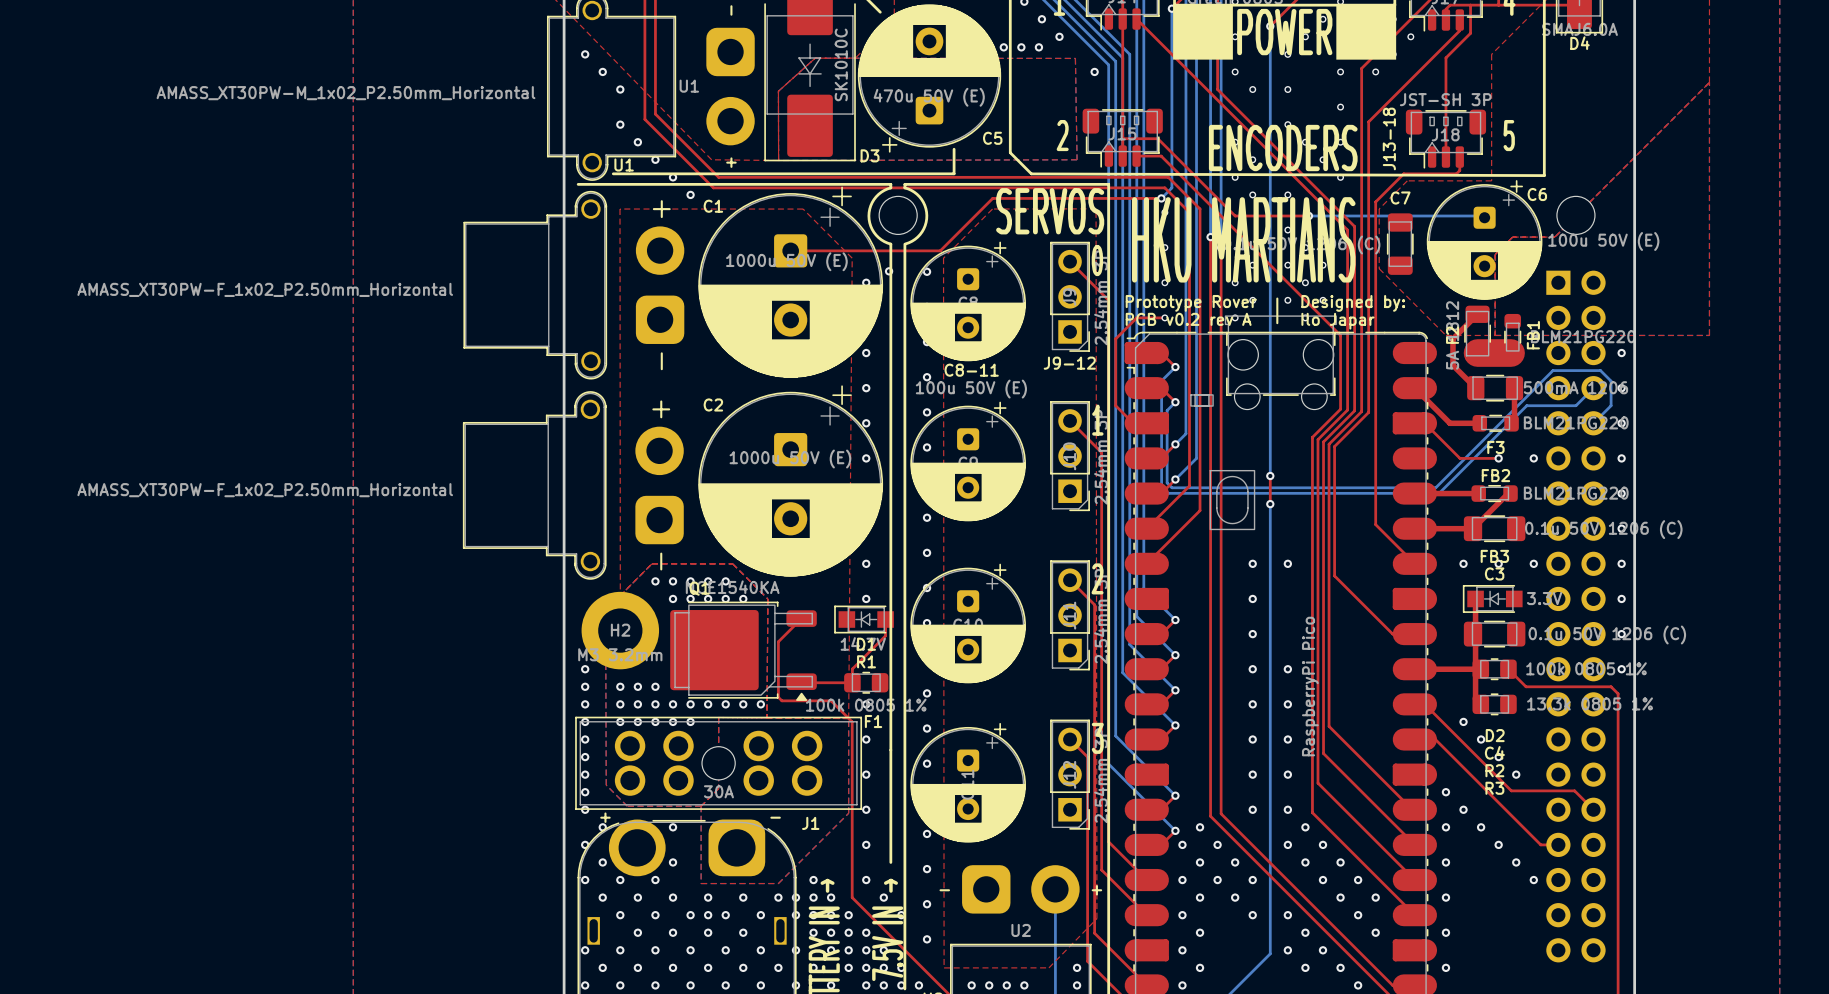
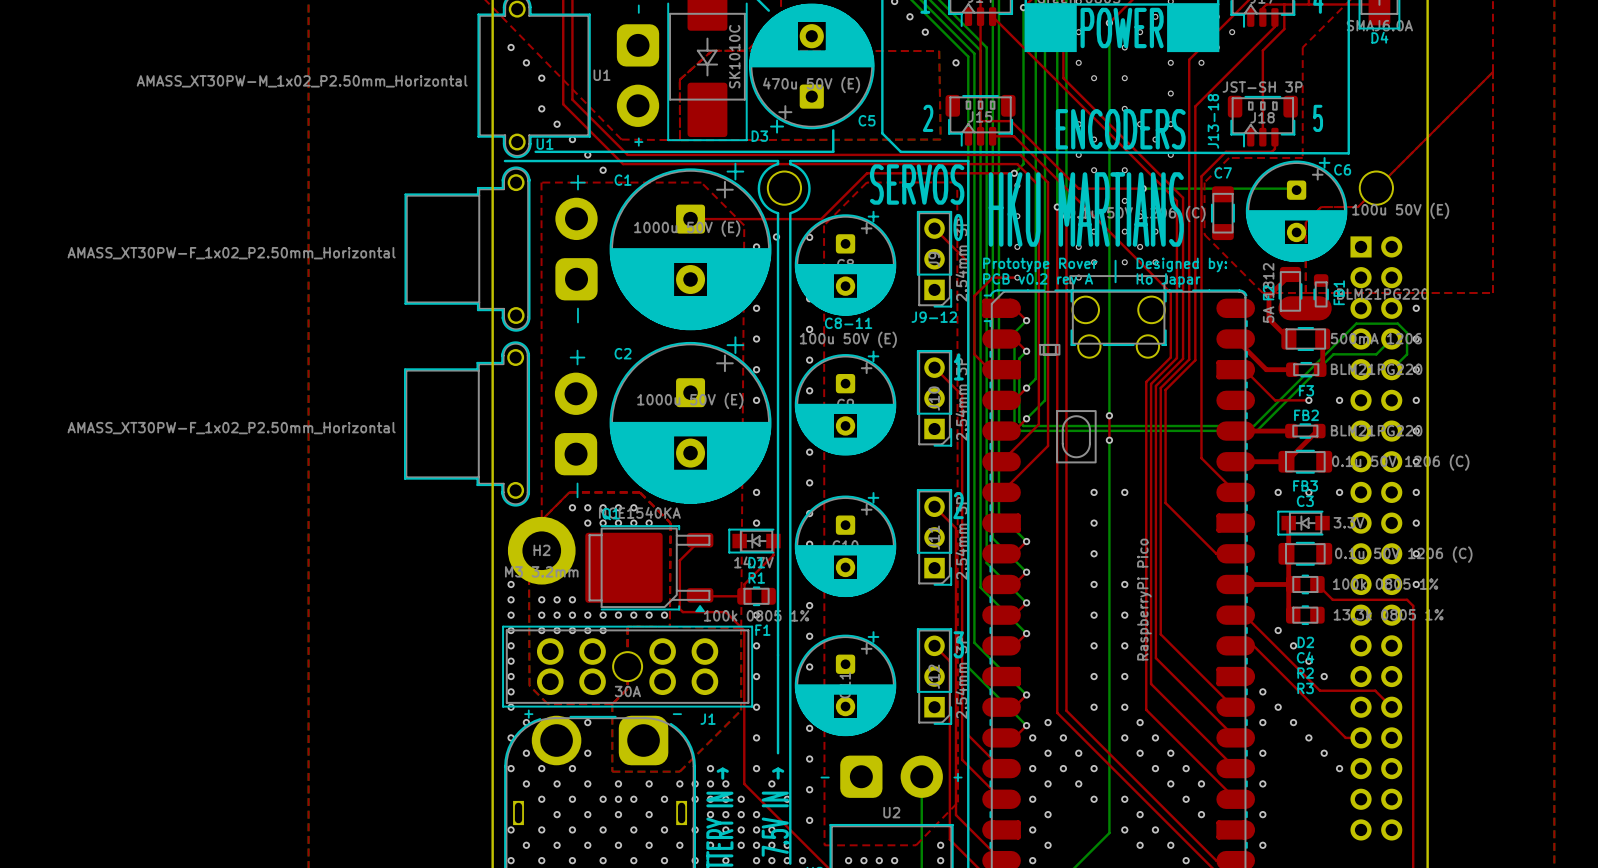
via: (1003, 47) -> none
via: (1021, 47) -> none
via: (1038, 47) -> none

